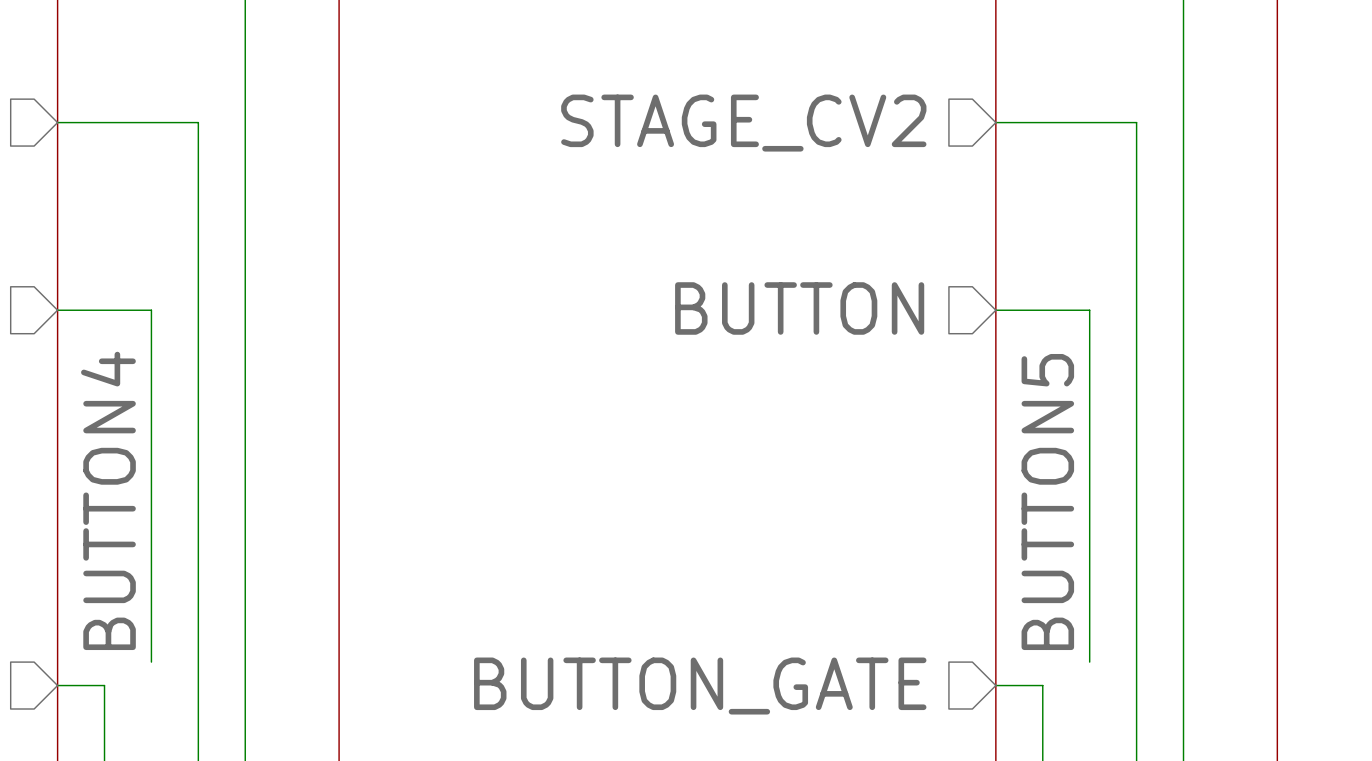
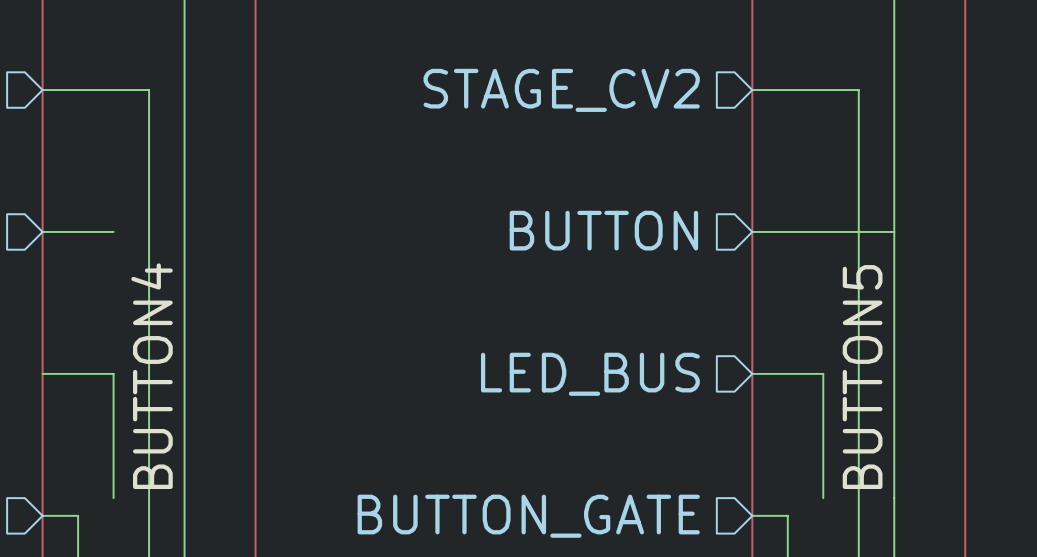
wire: (151, 310) (151, 497) -> (42, 373) (113, 373)
wire: (1089, 310) (1089, 497) -> (823, 231) (894, 231)
wire: none -> (752, 373) (823, 373)
sheet pin: none -> LED_BUS (590, 374)
label position: BUTTON4 (108, 500) -> BUTTON4 (152, 376)
label position: BUTTON5 (1047, 502) -> BUTTON5 (862, 377)

